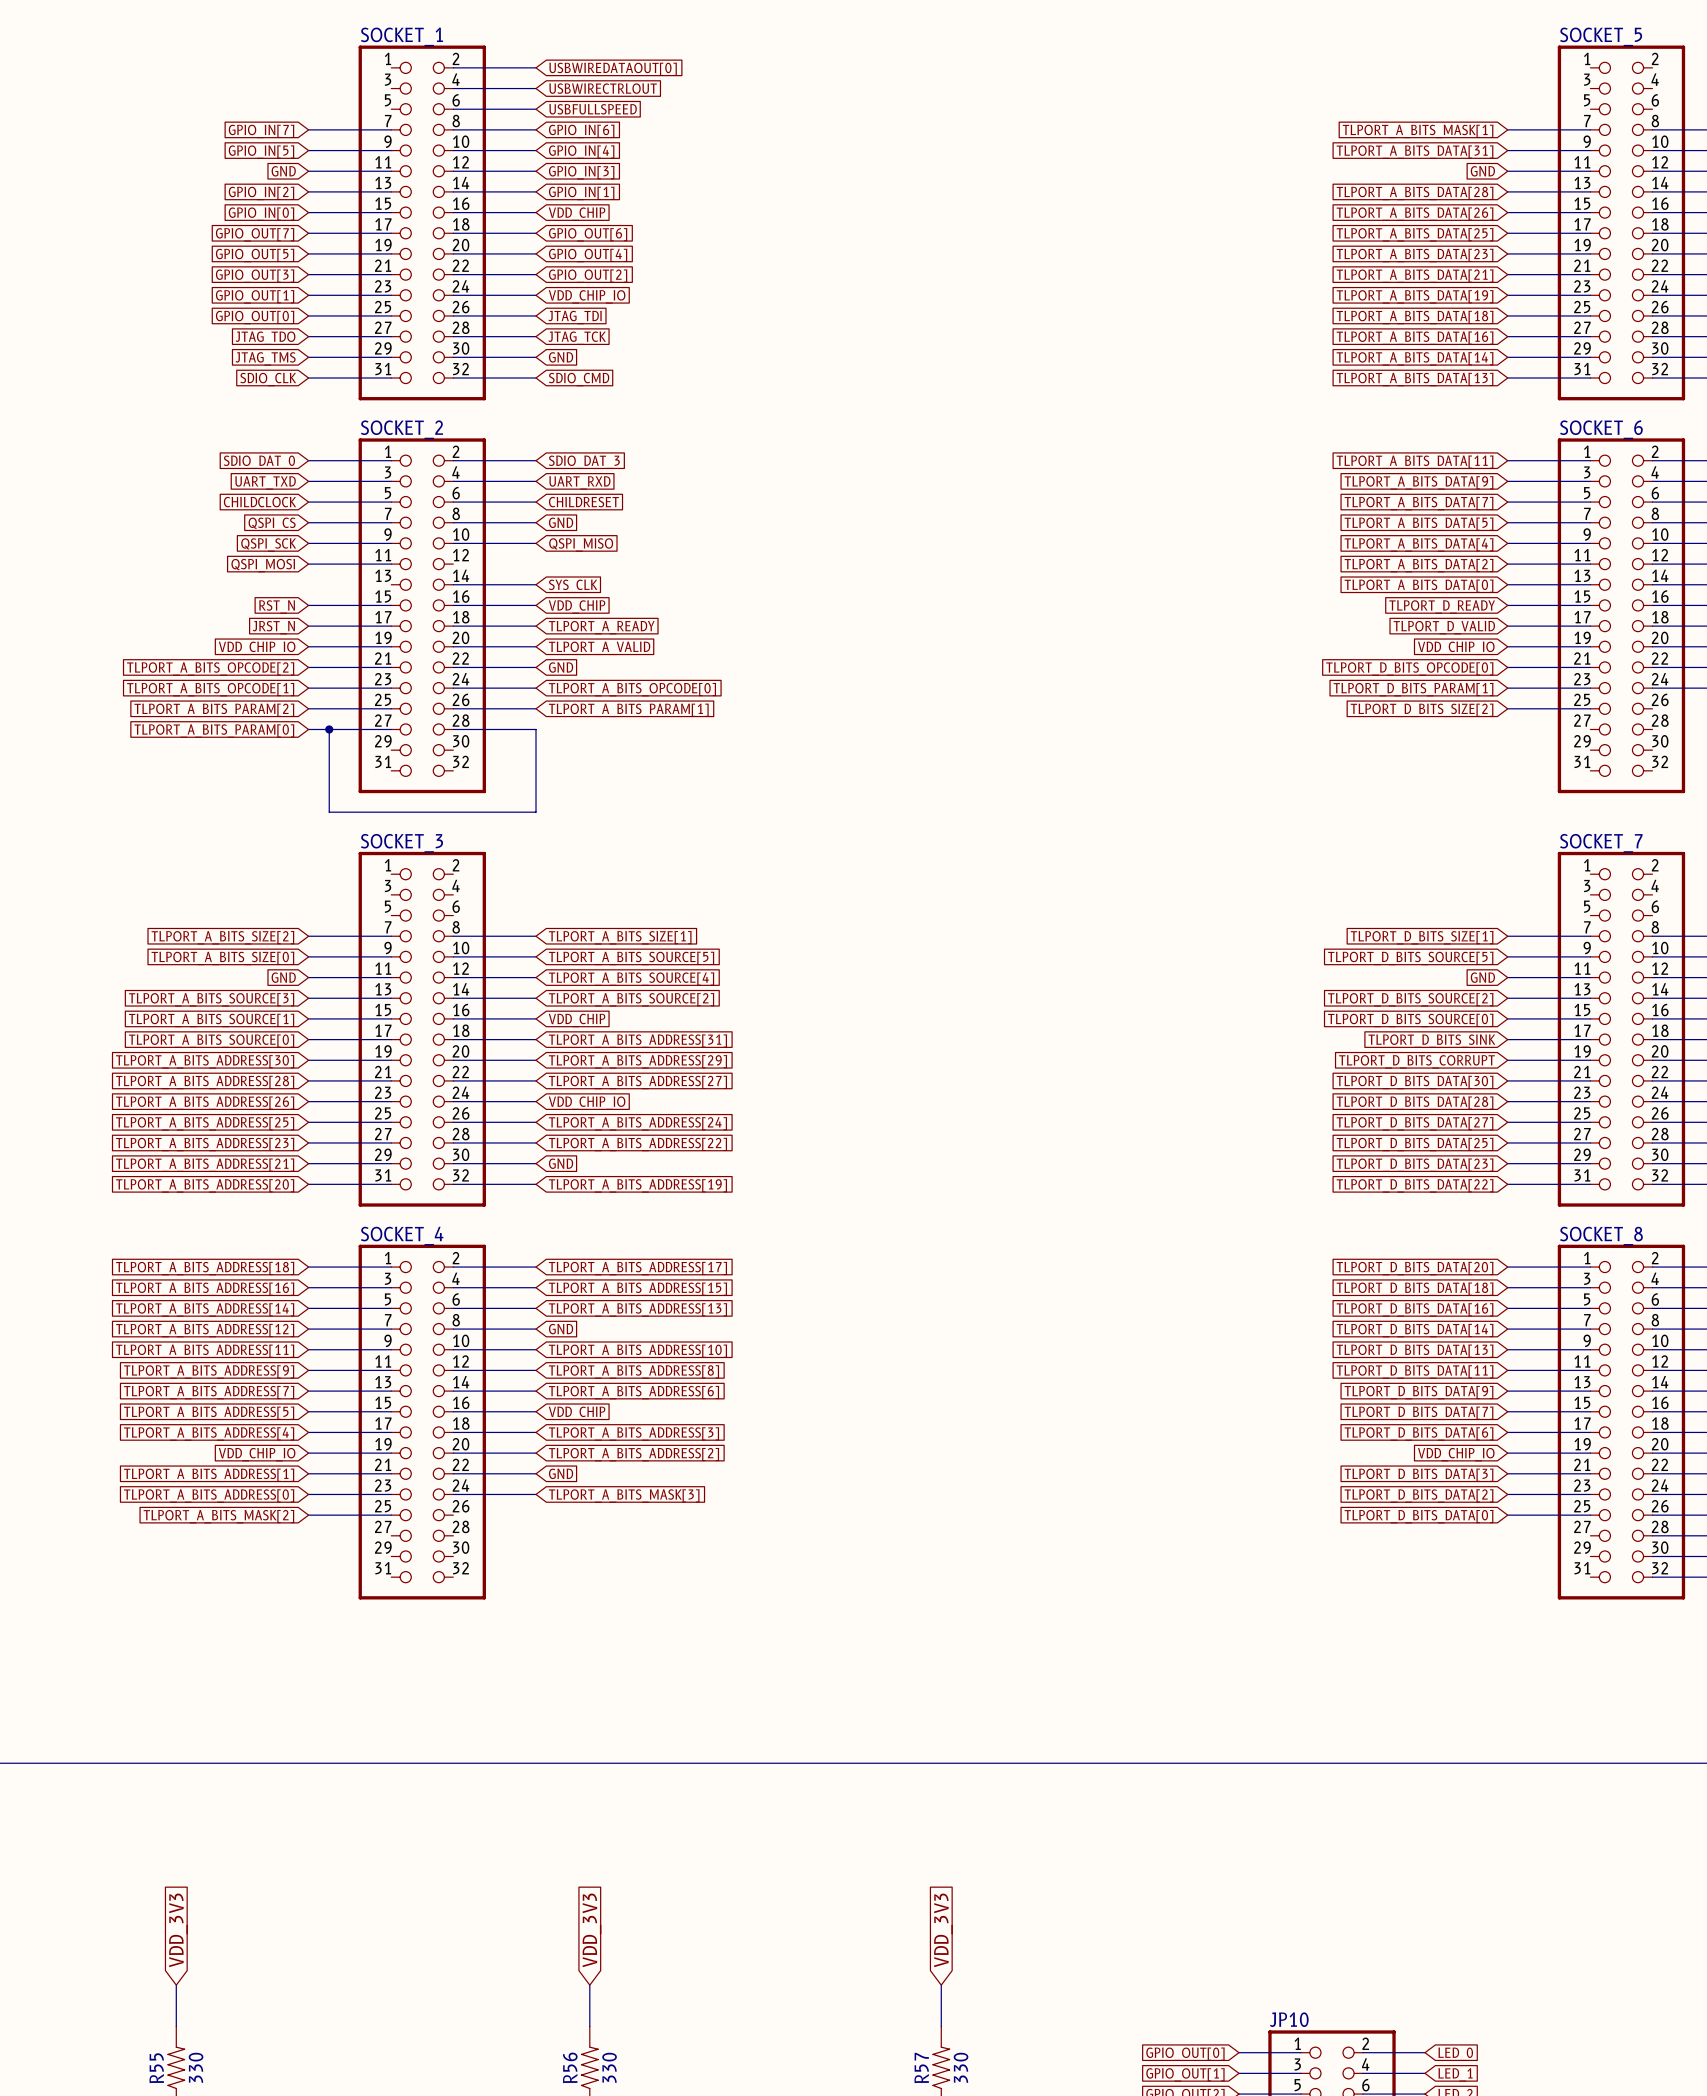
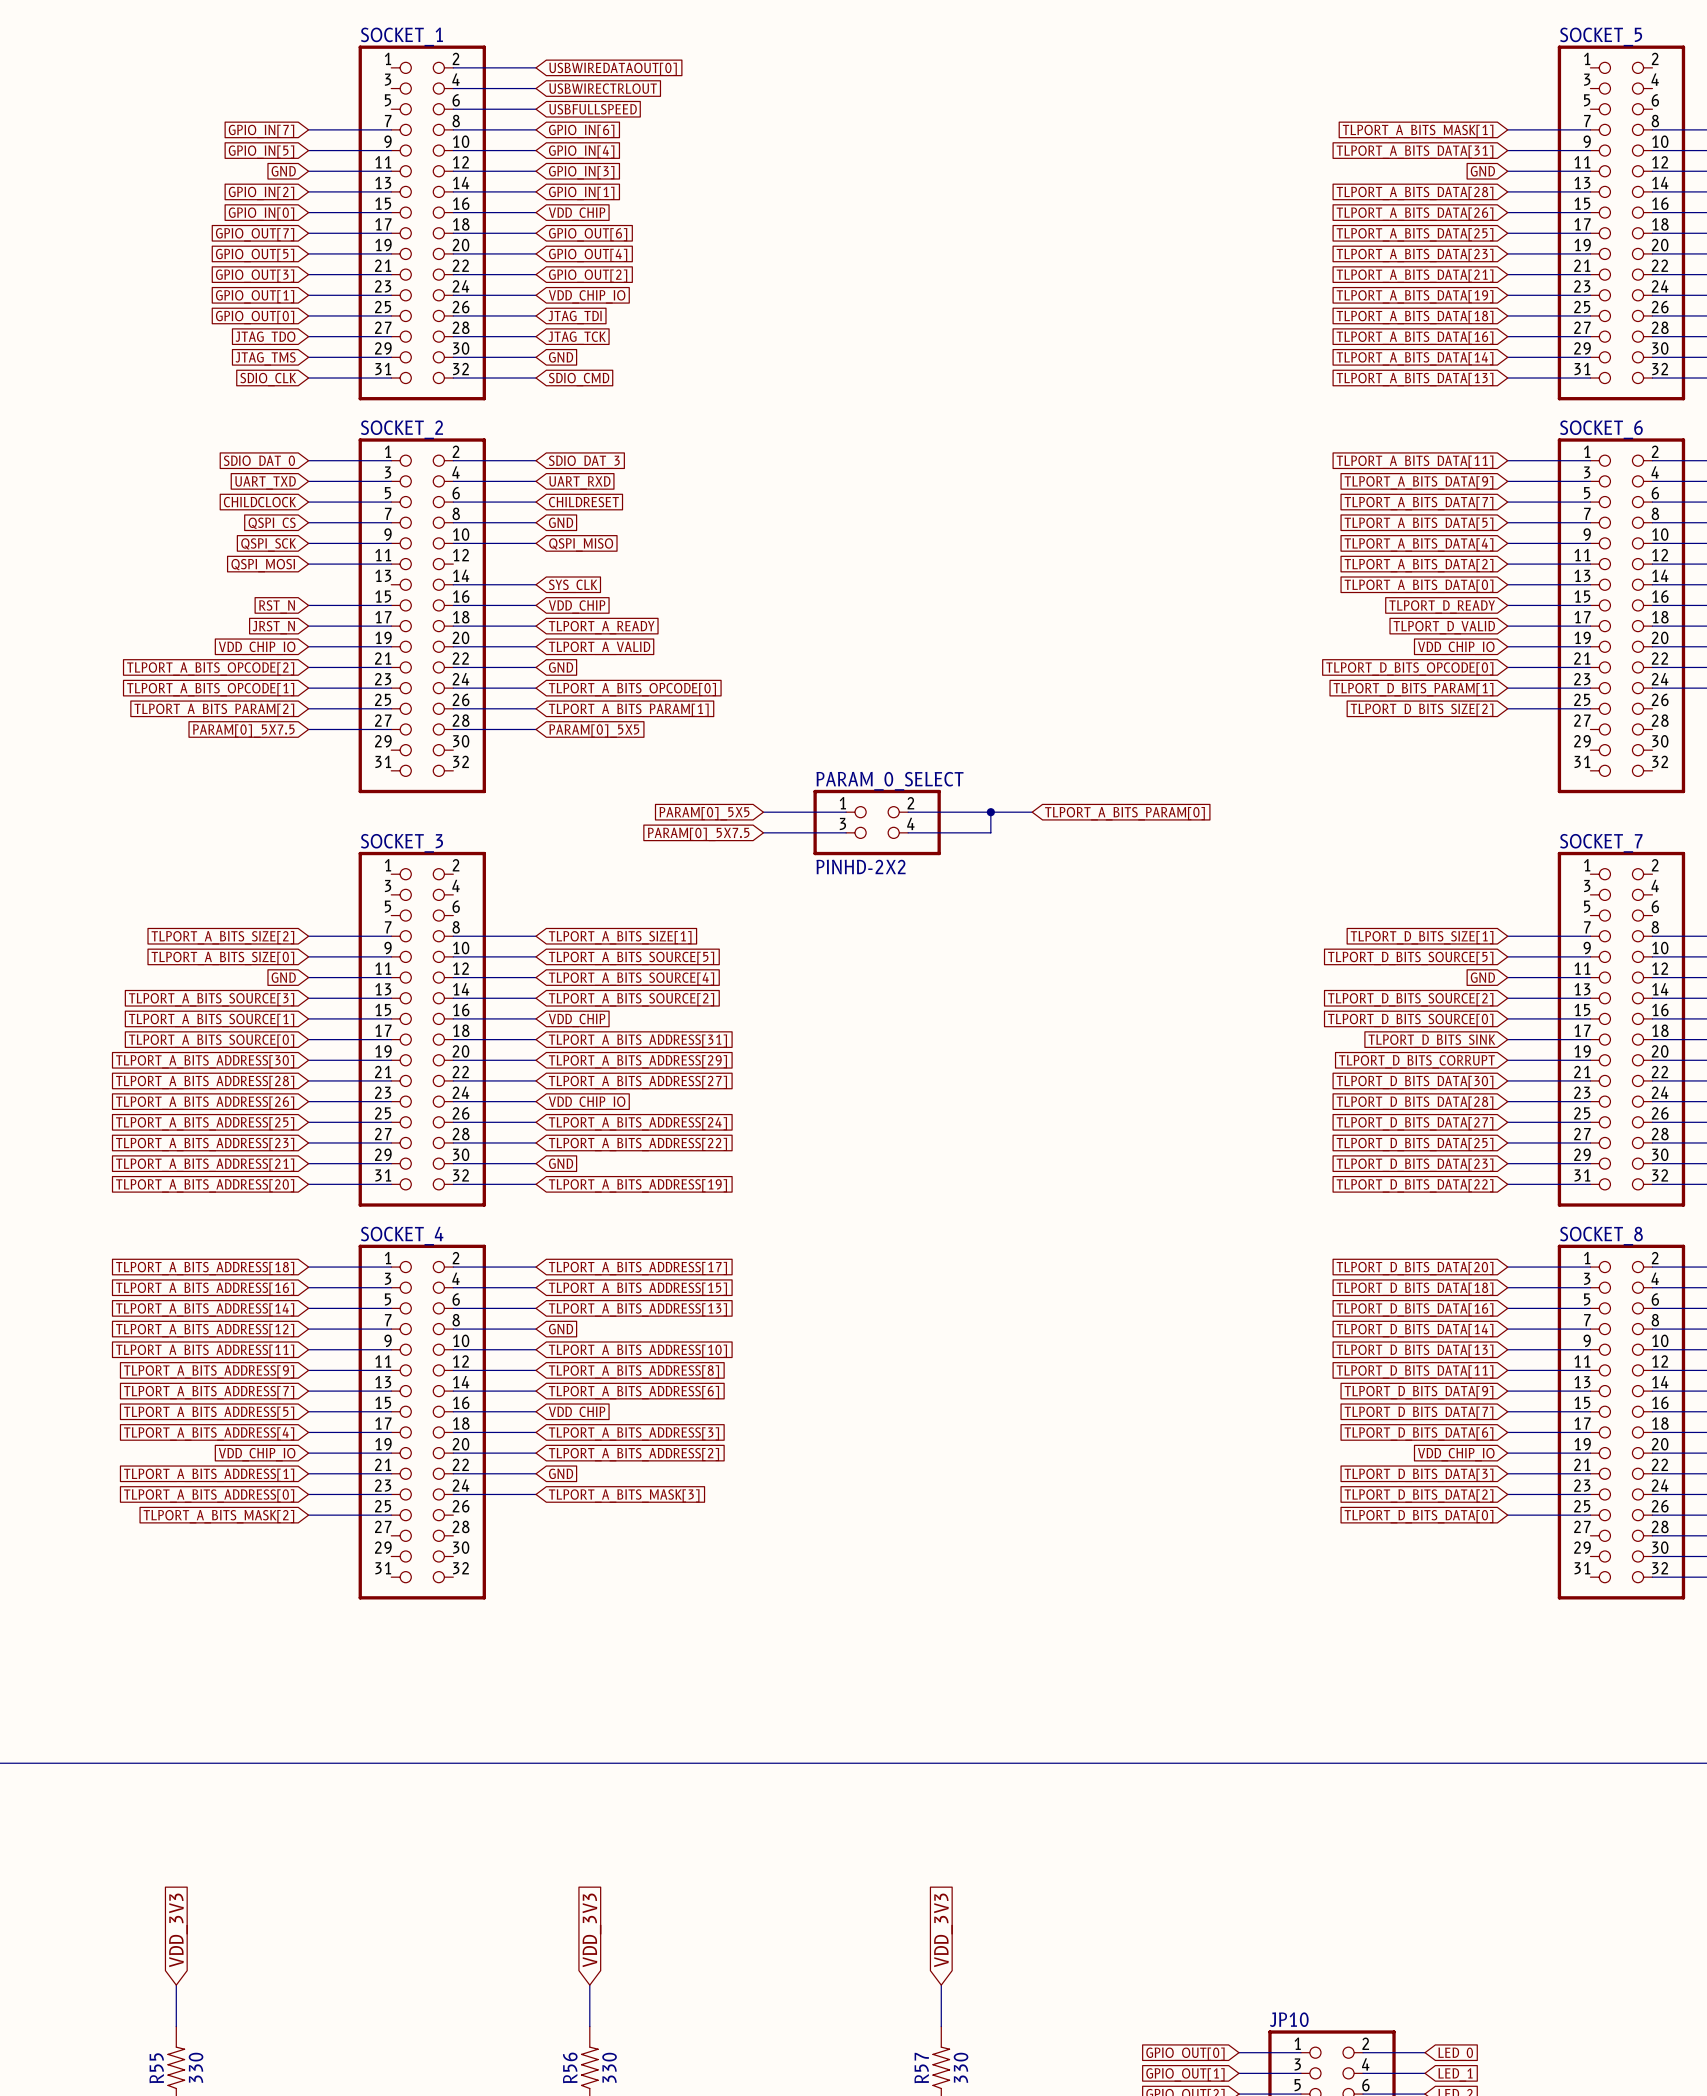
wire: (329, 729) (329, 812) (536, 812) (536, 729) -> none
junction: (329, 729) -> none
global label: TLPORT_A_BITS_PARAM[0] (214, 731) -> PARAM[0]_5X7.5 (243, 731)
global label: none -> PARAM[0]_5X5 (594, 731)
wire: none -> (763, 812) (846, 812)
wire: none -> (908, 812) (1032, 812)
wire: none -> (990, 812) (990, 832) (908, 832)
junction: none -> (990, 812)
global label: none -> PARAM[0]_5X5 (704, 813)
global label: none -> TLPORT_A_BITS_PARAM[0] (1125, 813)
PARAM_0_SELECT: none -> PINHD-2X2 (877, 822)
wire: none -> (763, 832) (846, 832)
global label: none -> PARAM[0]_5X7.5 (698, 834)

